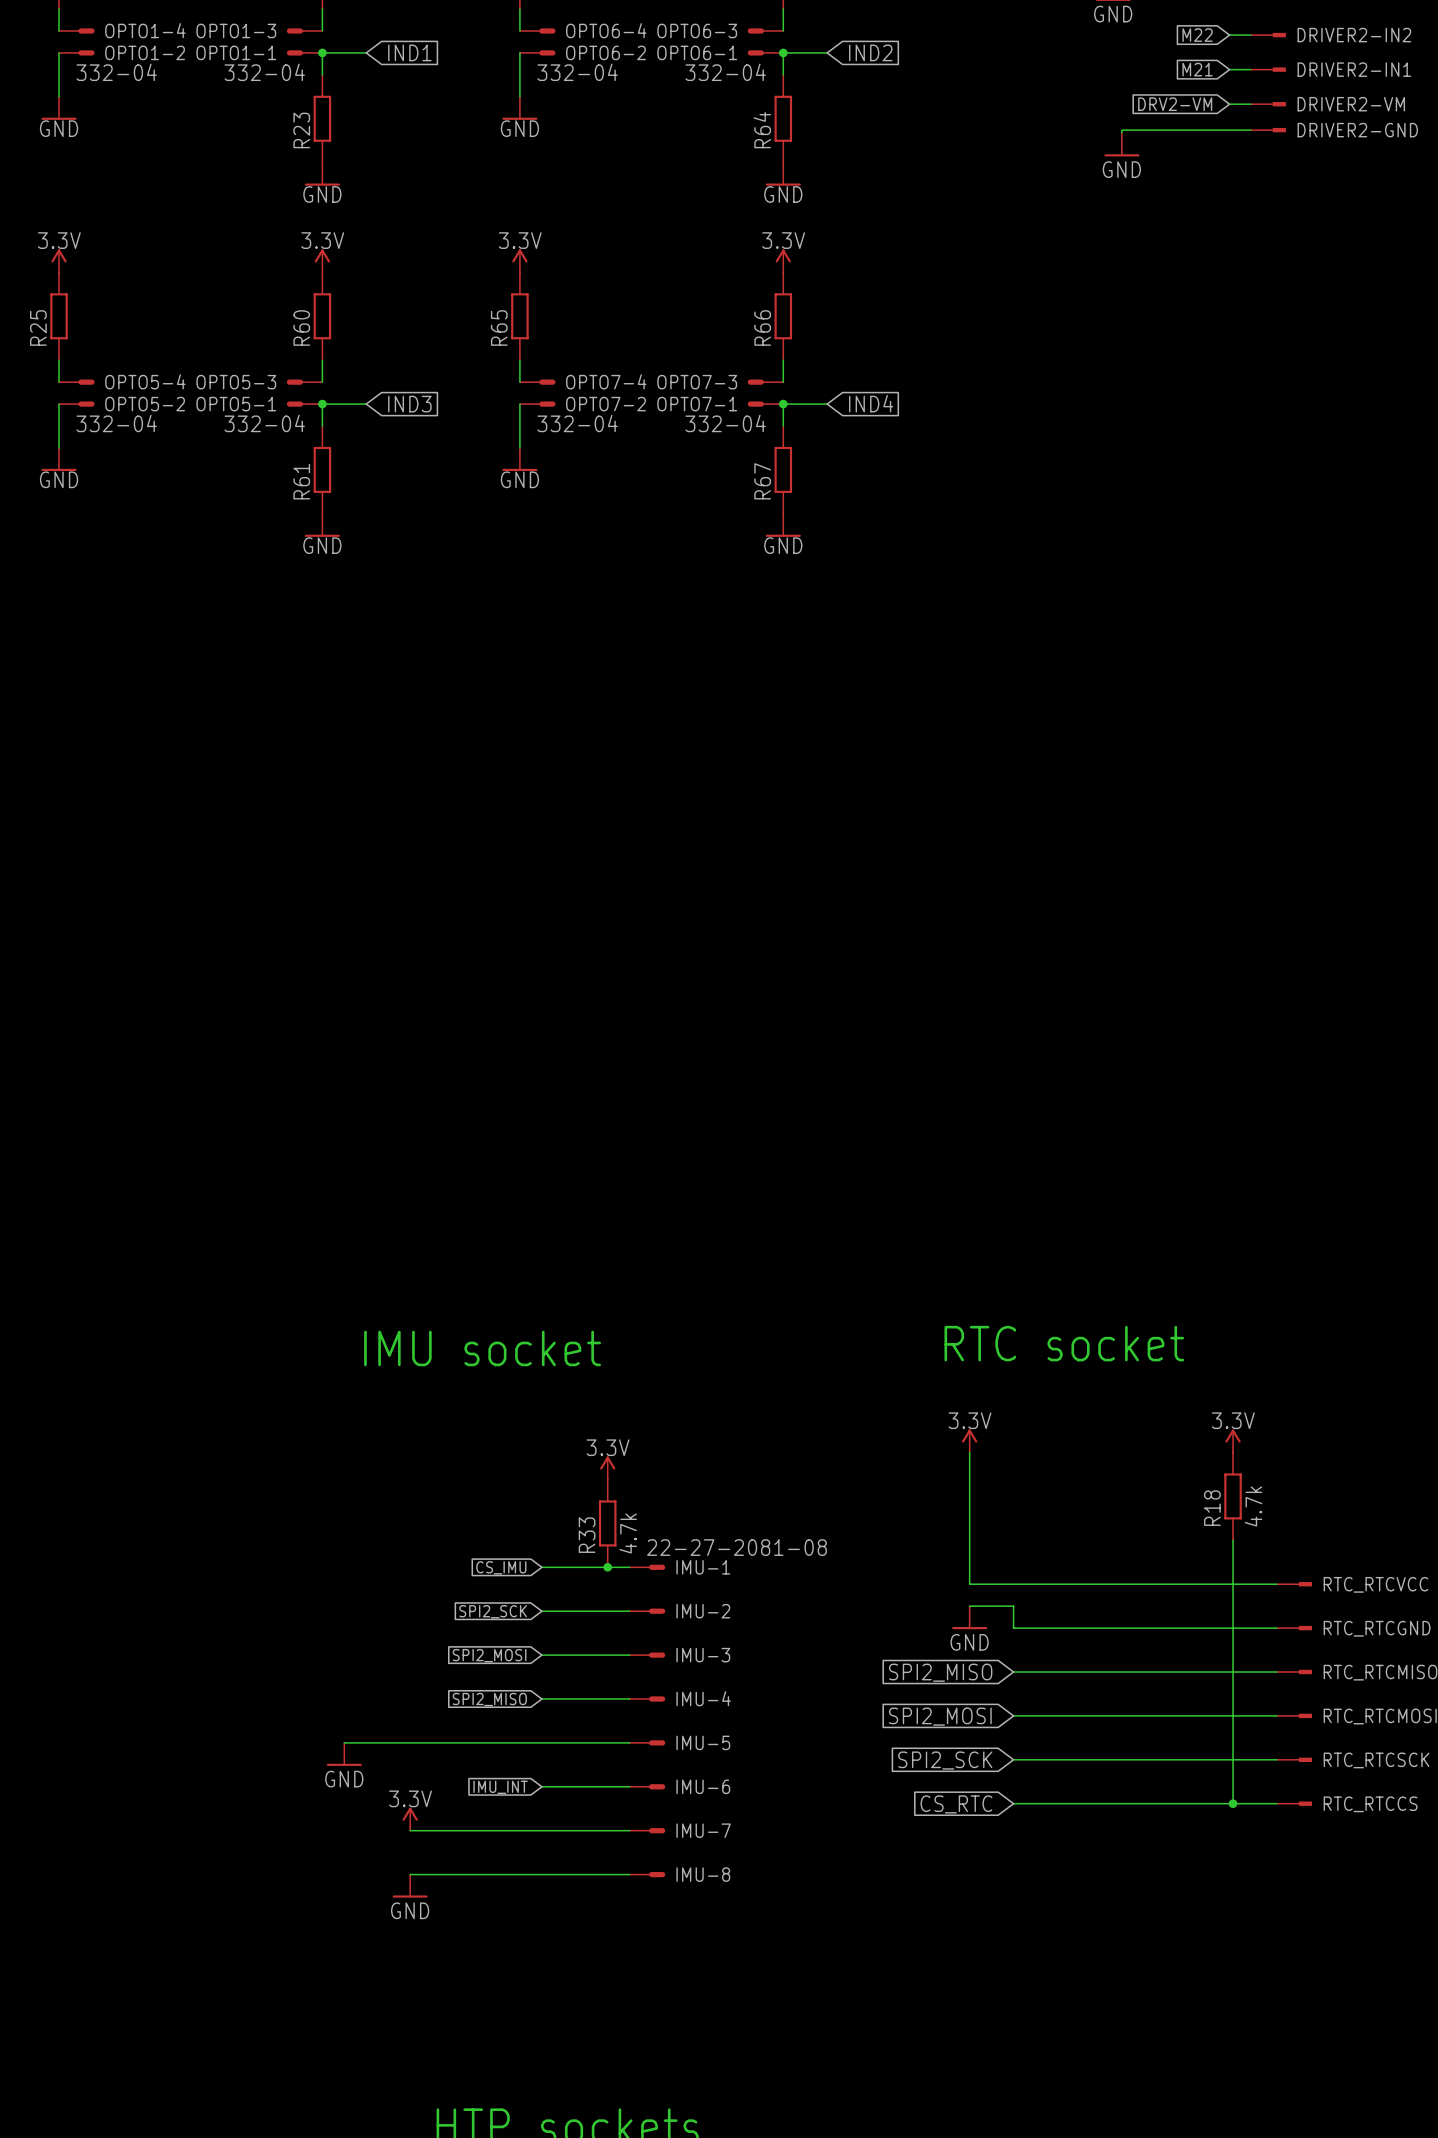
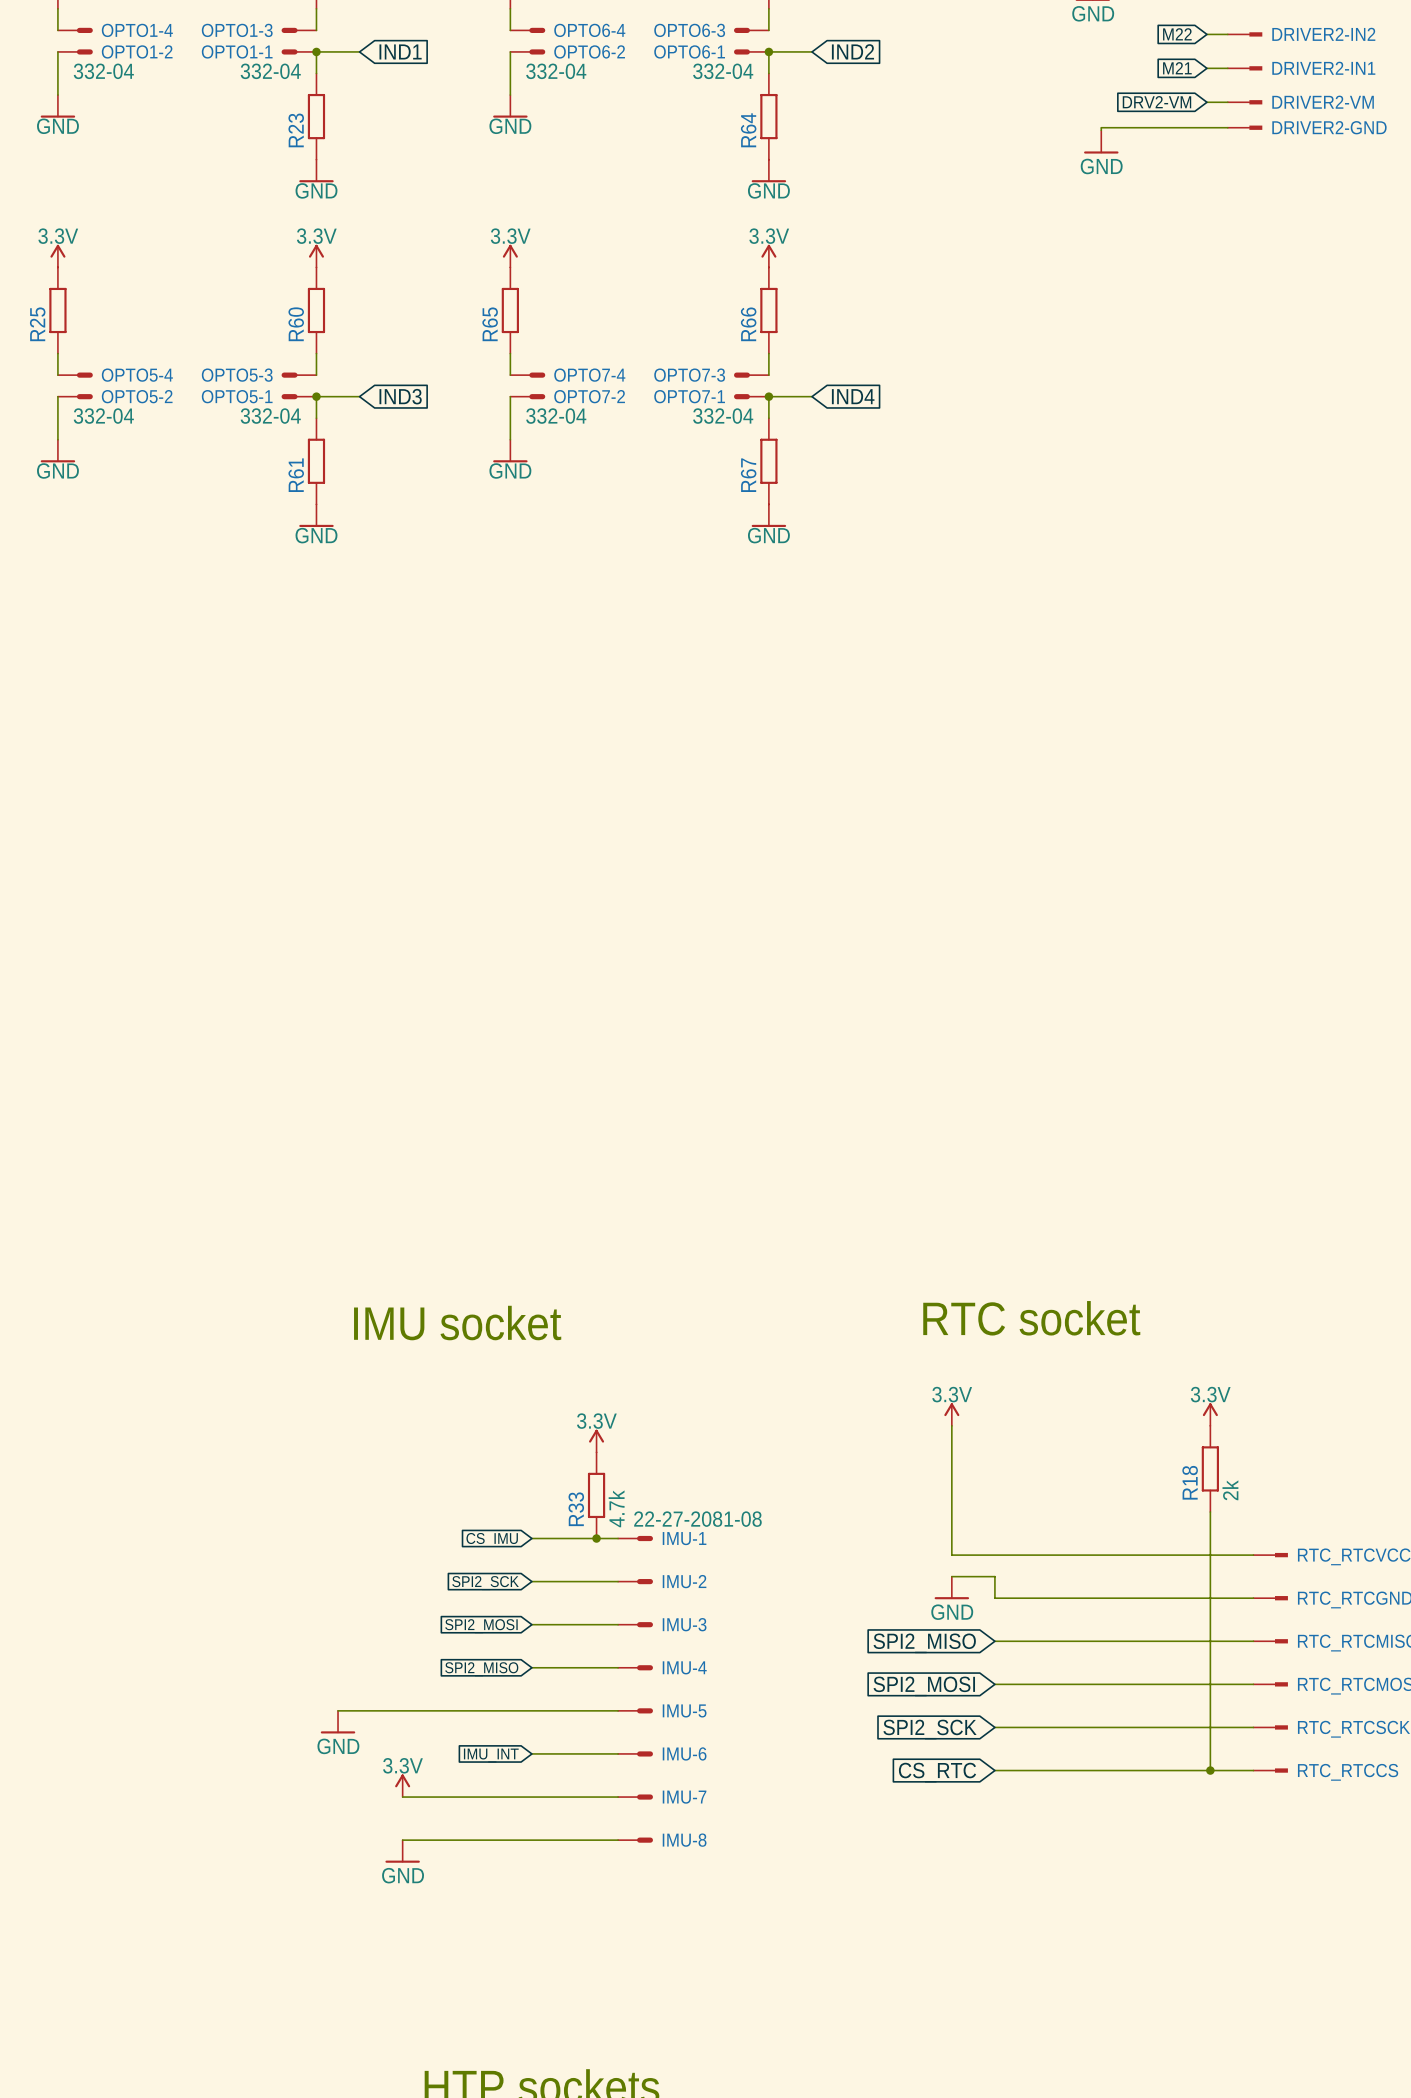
R18 value: 4.7k (1253, 1506) -> 2k (1230, 1490)

